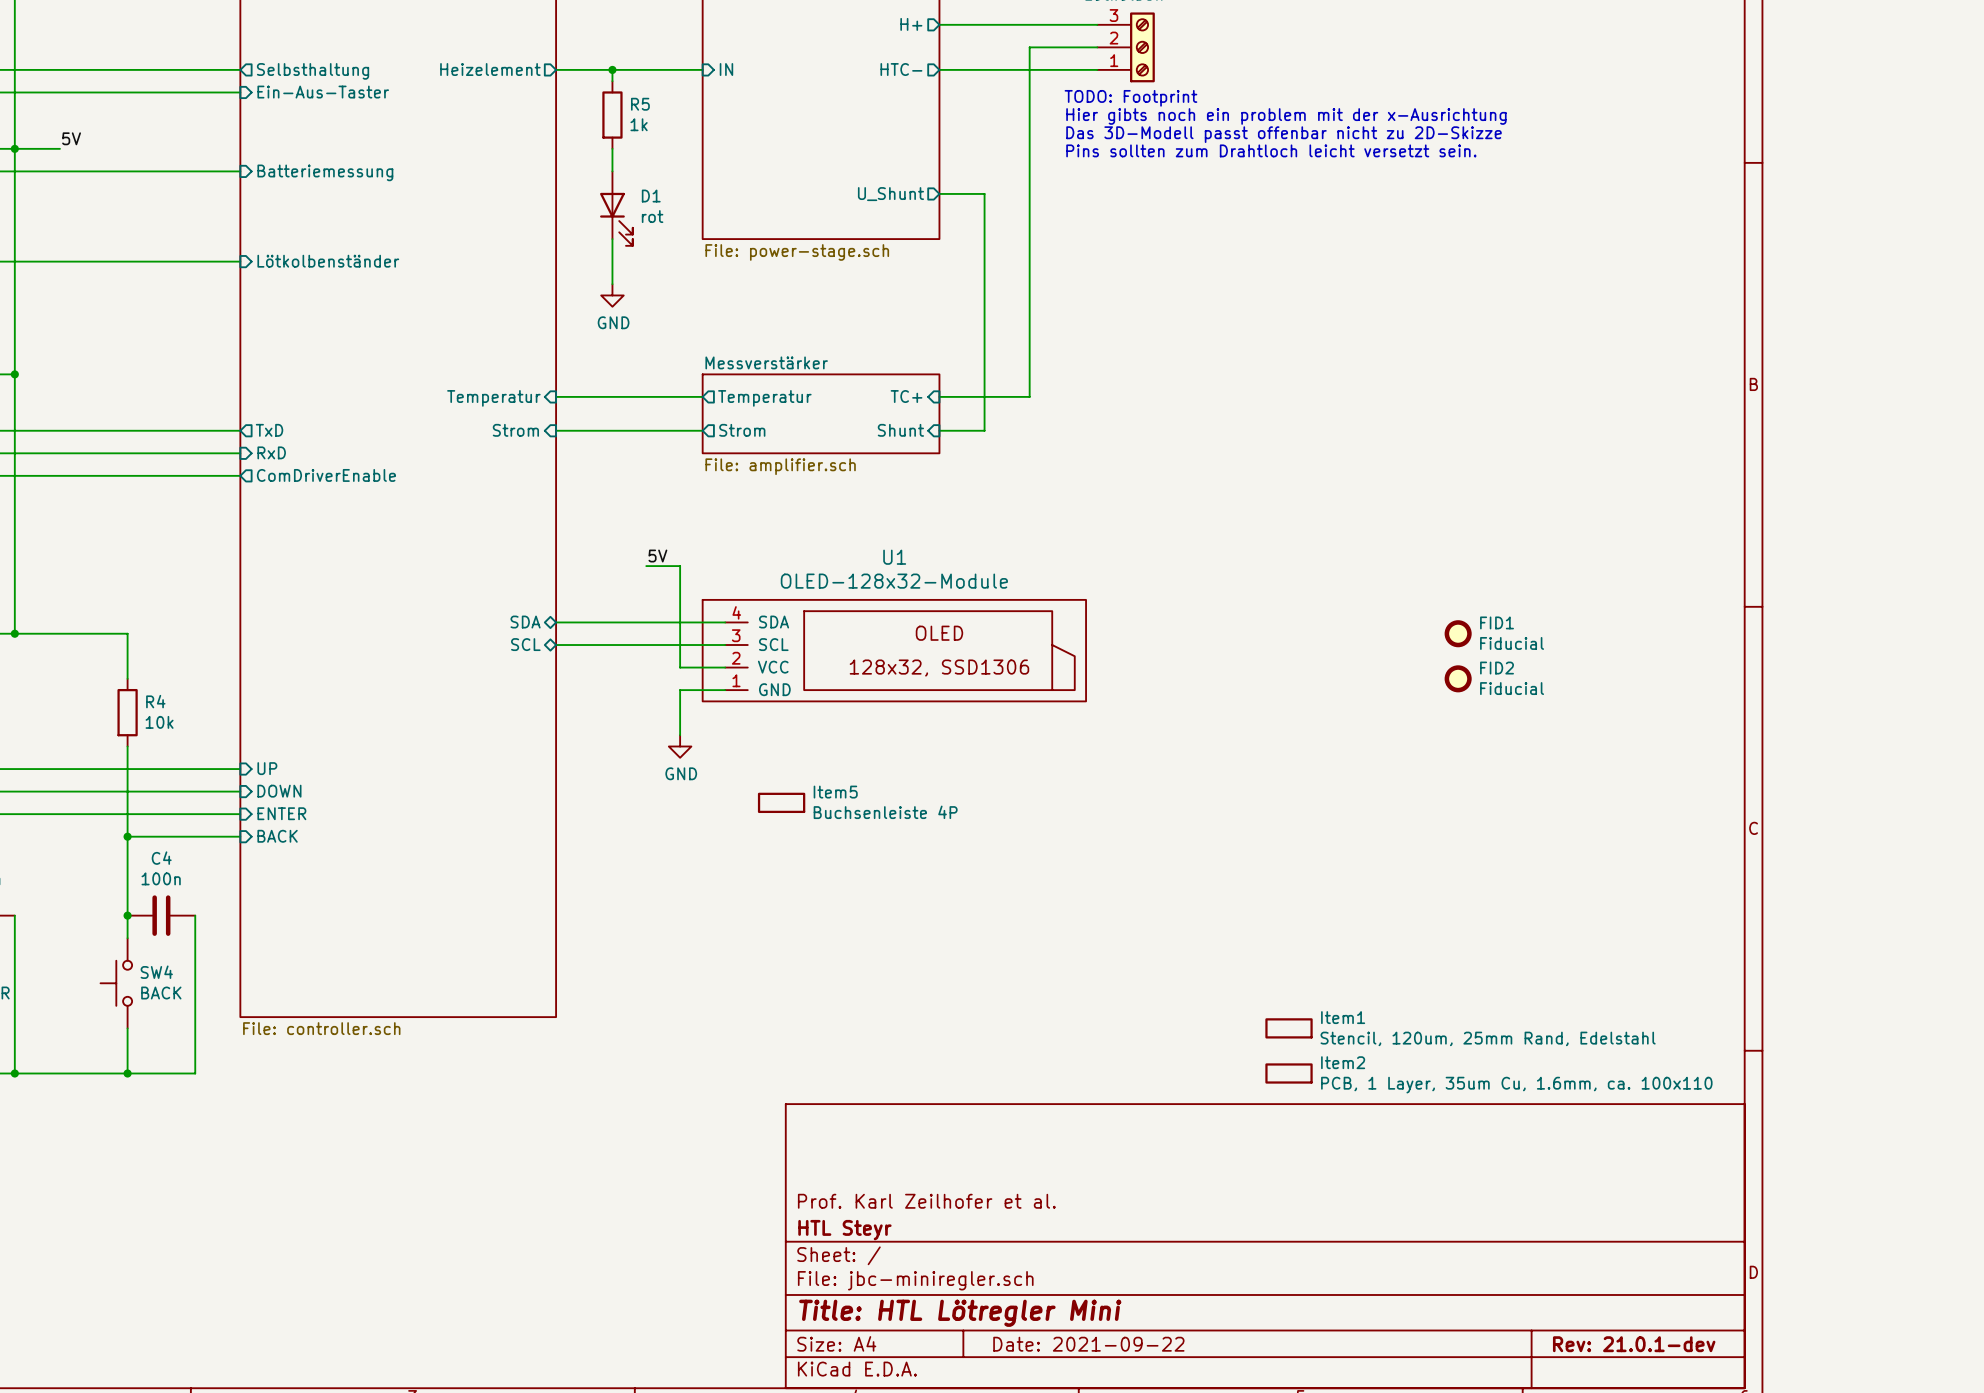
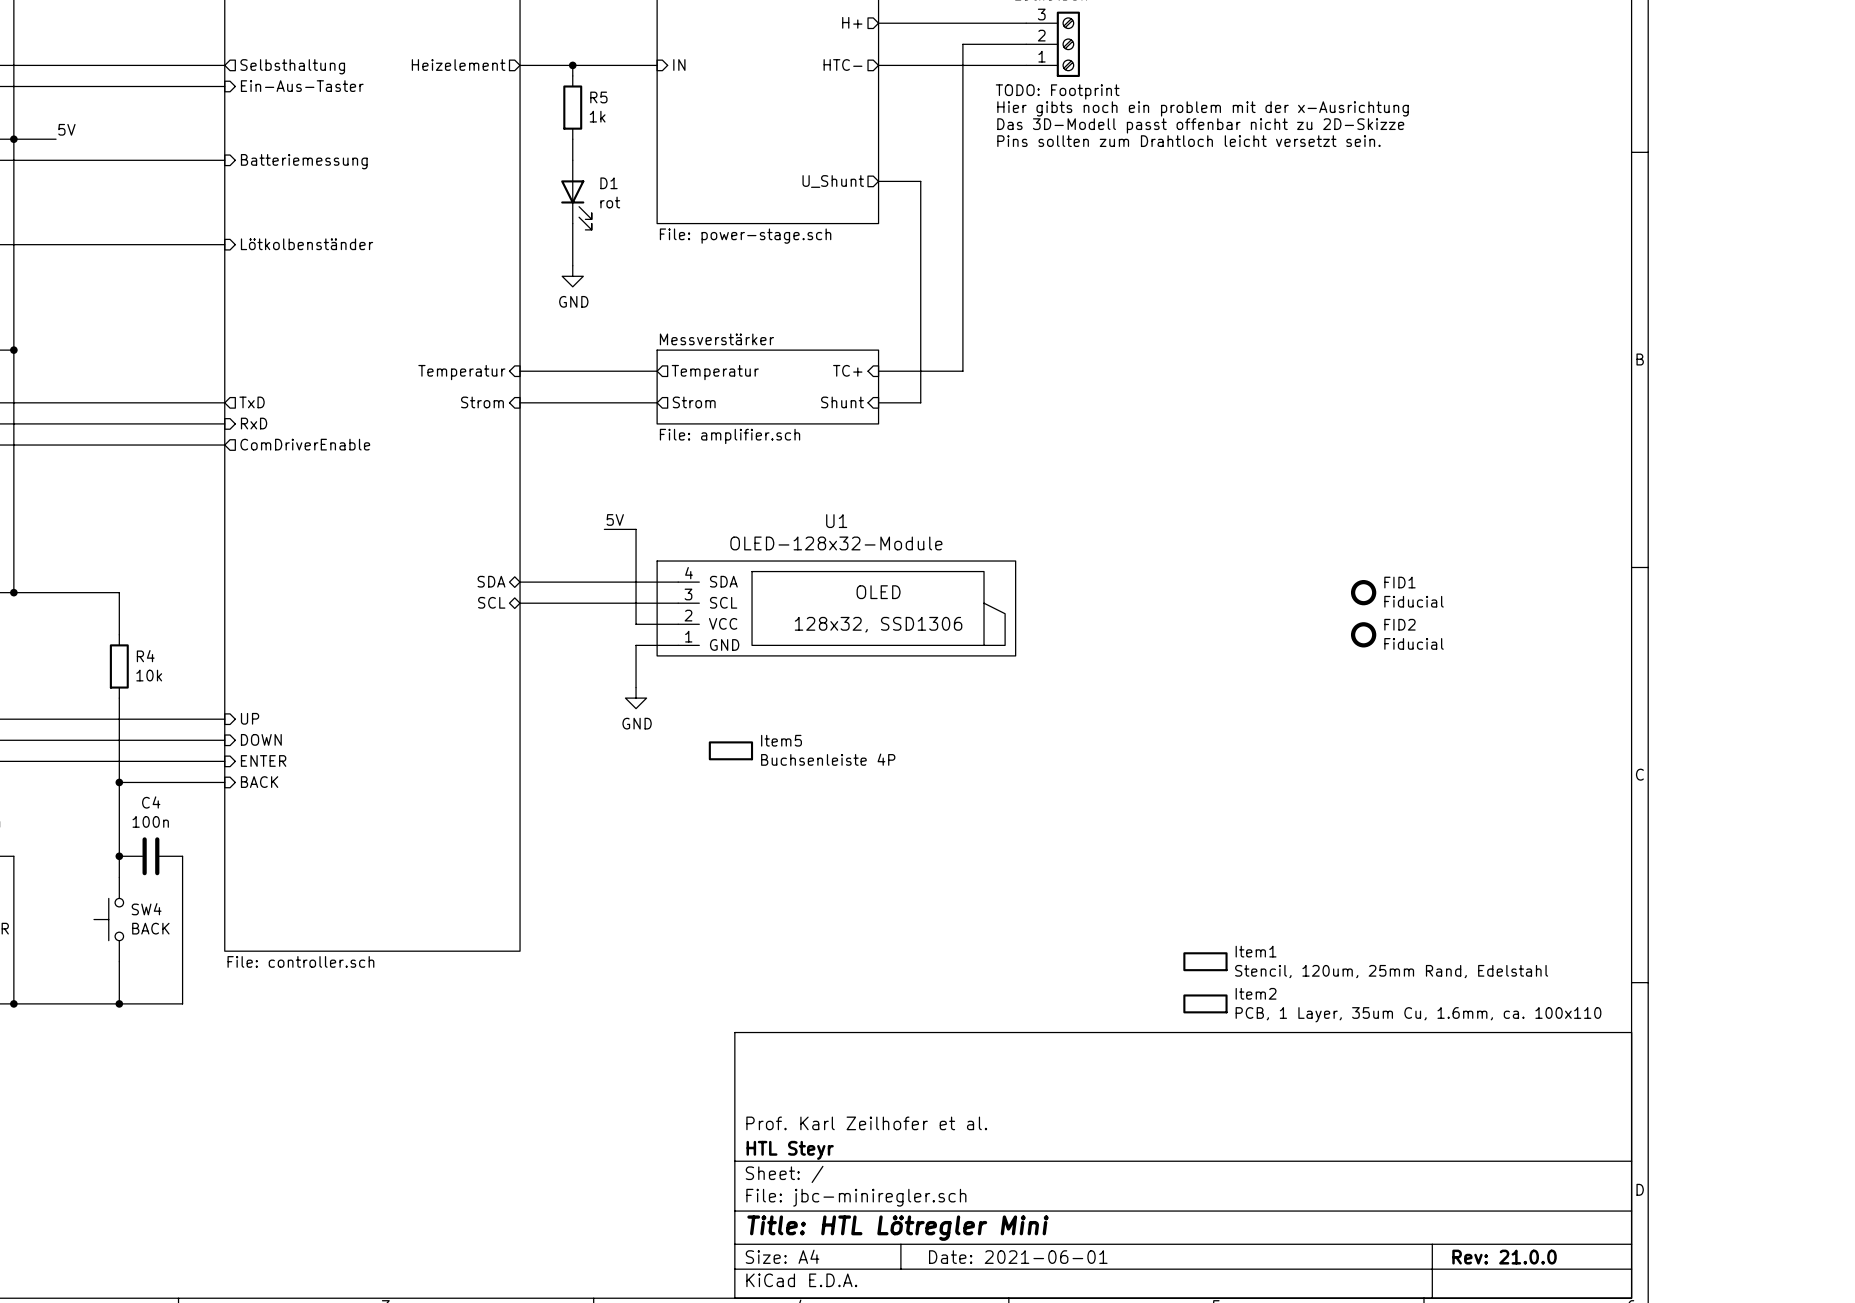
title block: Date: 2021-09-22 (1088, 1344) -> Date: 2021-06-01 (1018, 1257)
title block: Rev: 21.0.1-dev (1634, 1344) -> Rev: 21.0.0 (1504, 1257)

